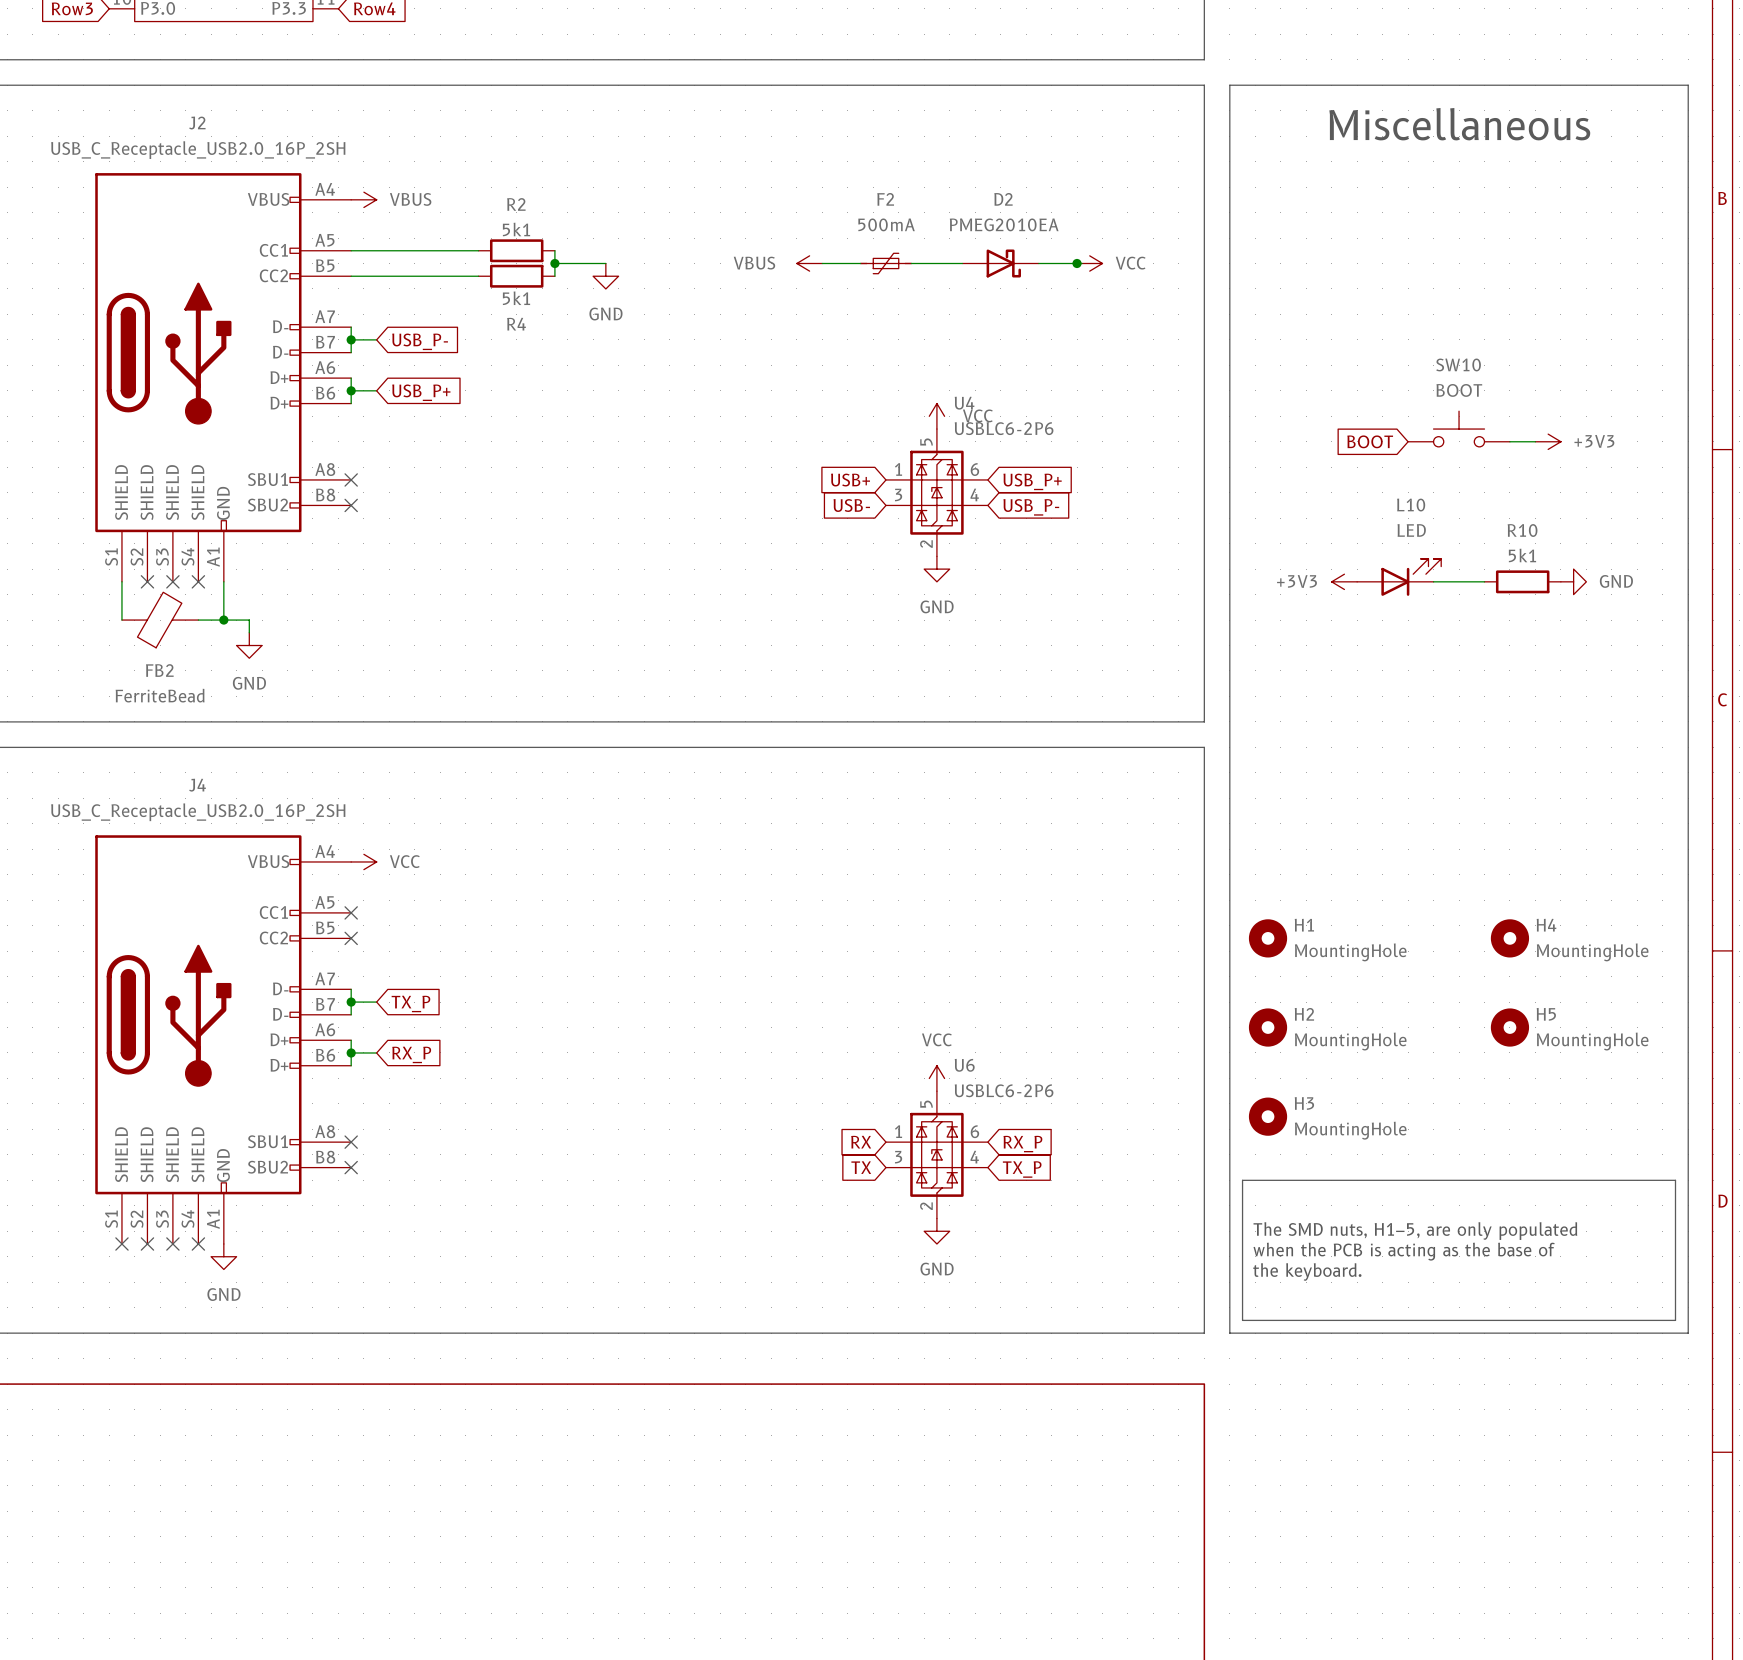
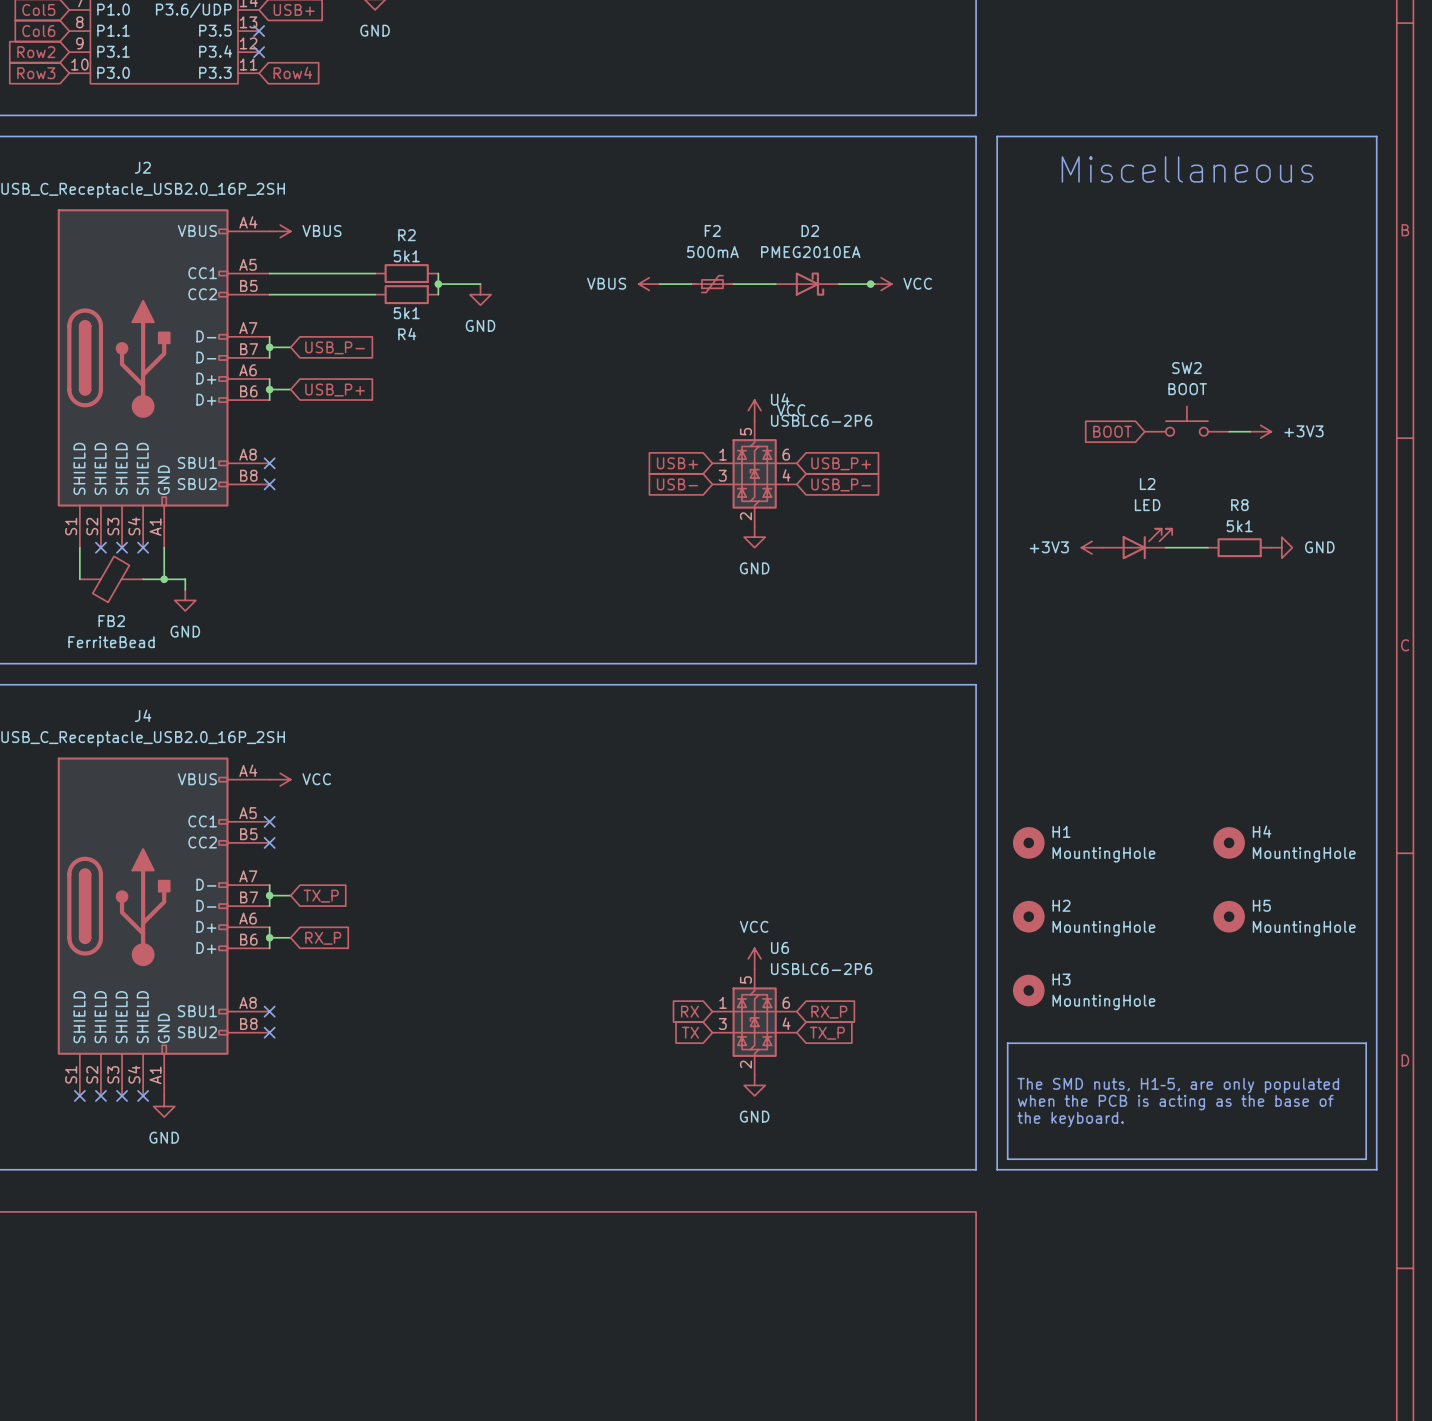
SW10 name: SW10 (1458, 364) -> SW2 (1186, 368)
L10 name: L10 (1411, 505) -> L2 (1147, 484)
R10 name: R10 (1522, 530) -> R8 (1239, 505)

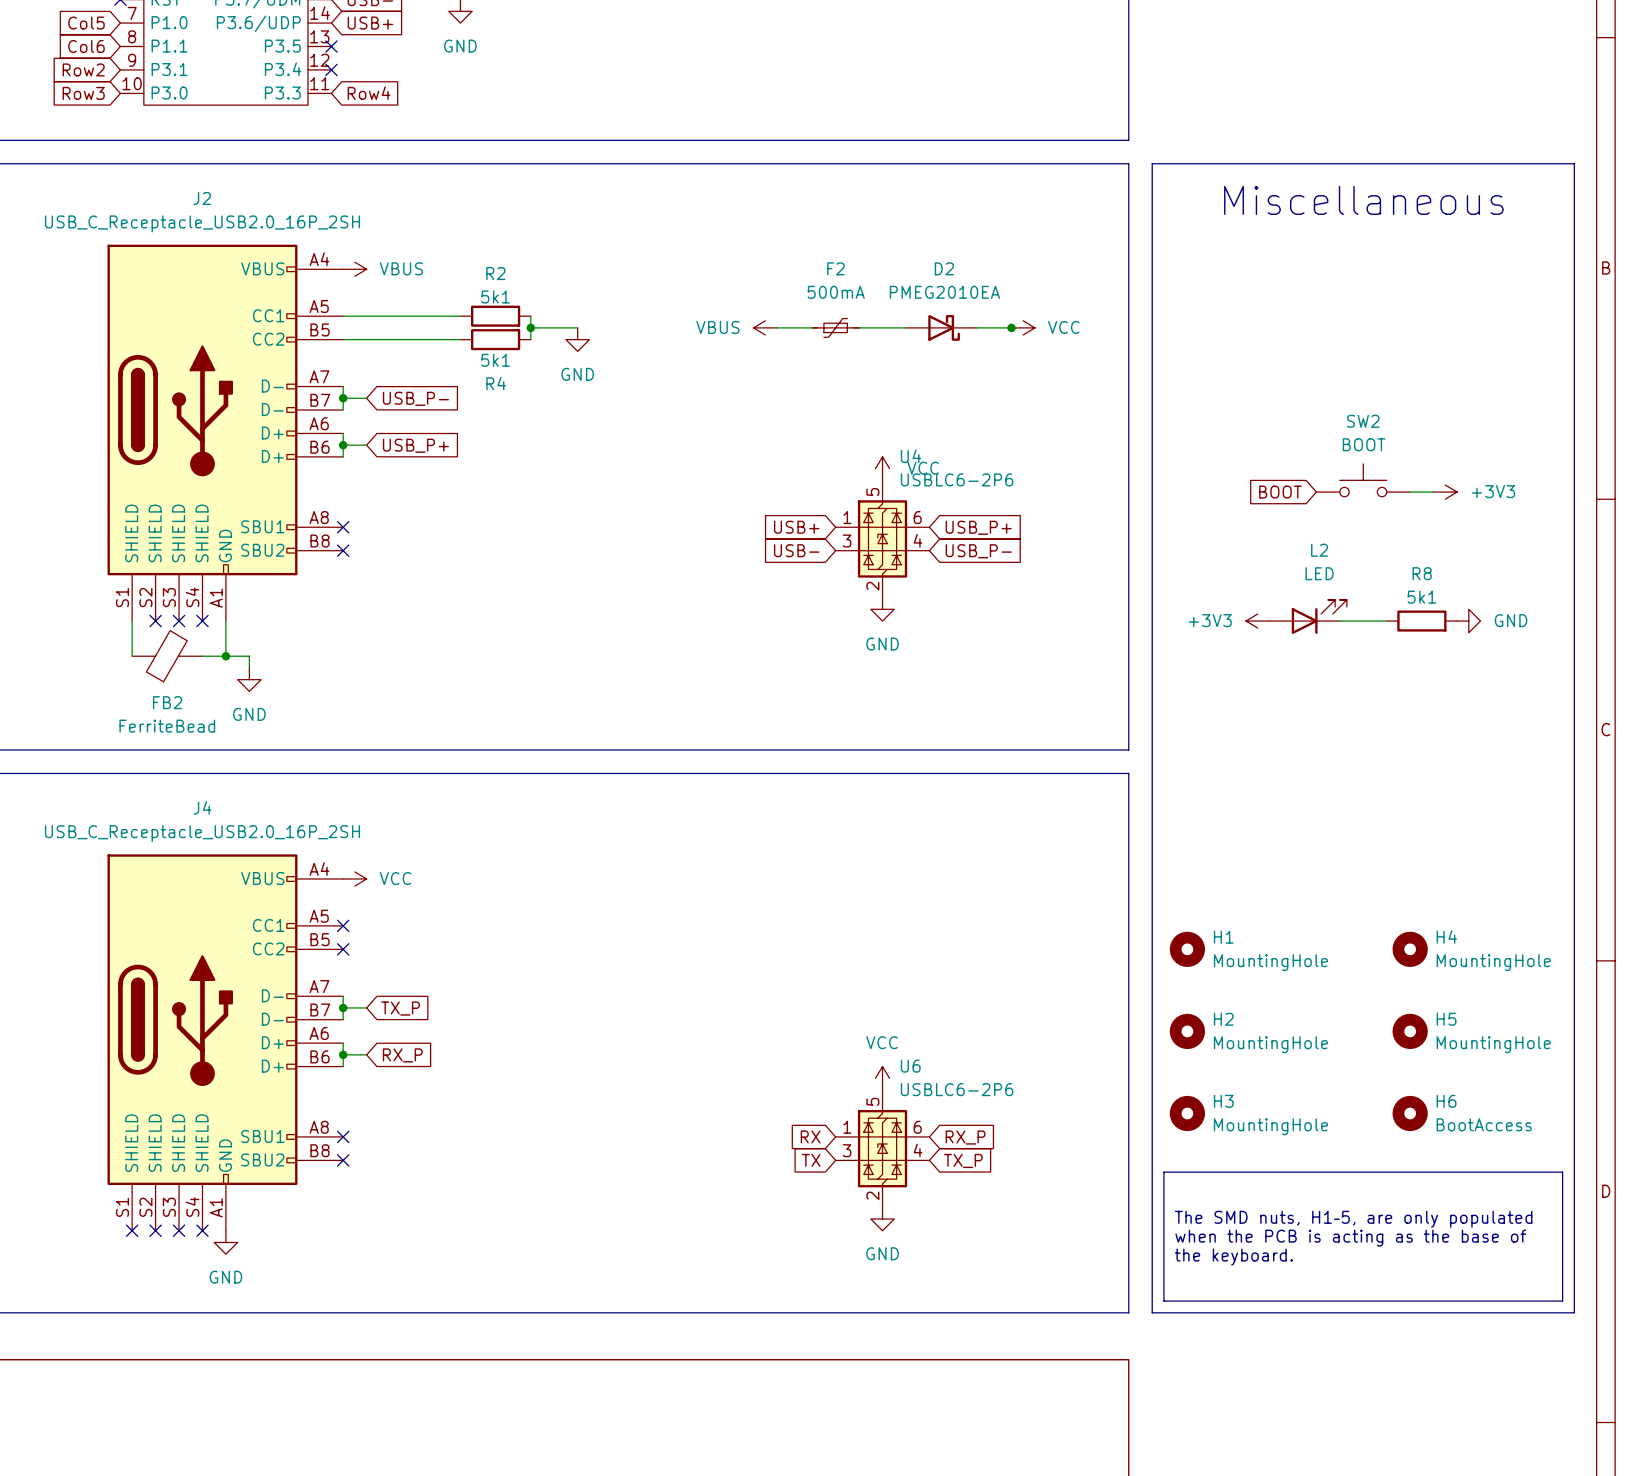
H6: none -> BootAccess (1410, 1113)

